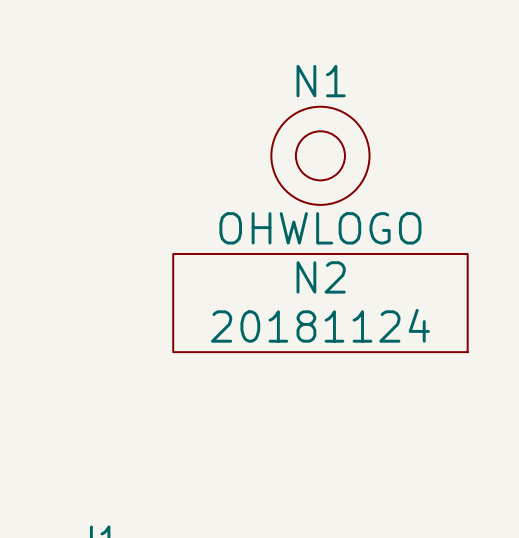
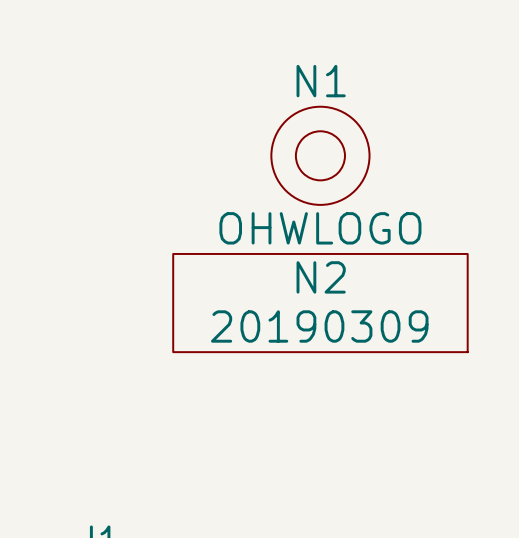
N2 value: 20181124 (320, 325) -> 20190309 (319, 326)

